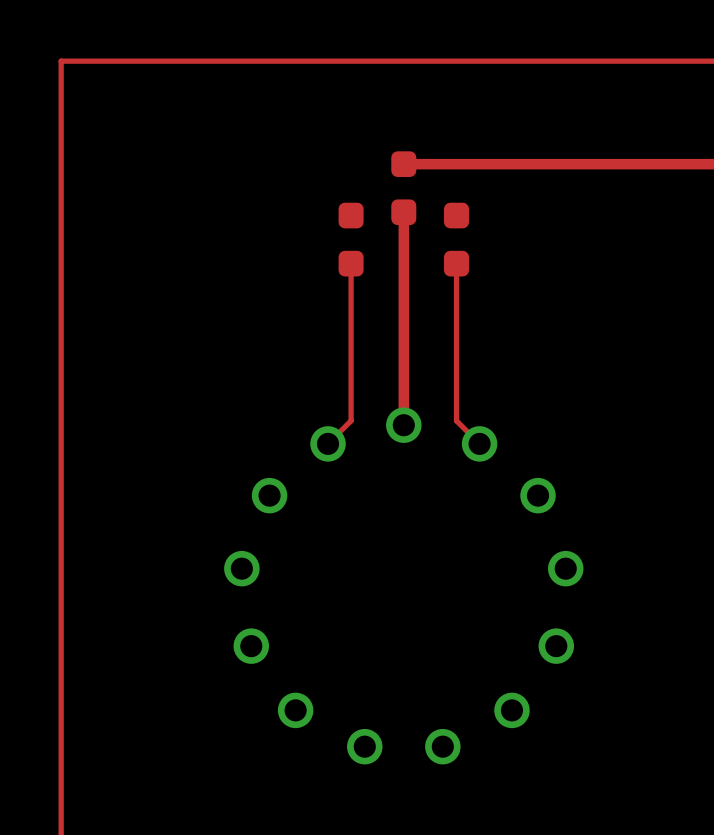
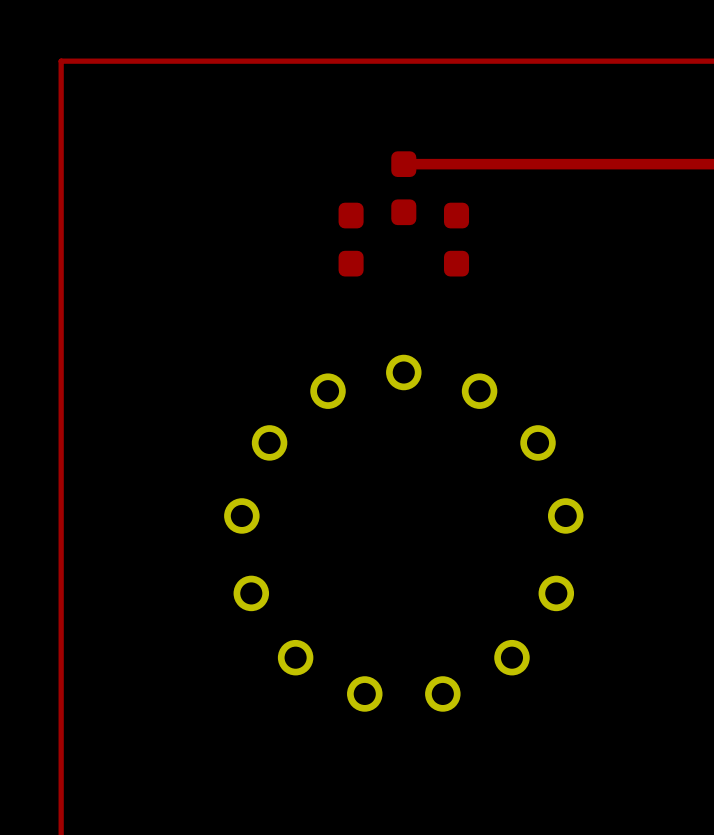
top track: (403, 212) (403, 425) -> none
top track: (351, 263) (351, 420) (328, 443) -> none
top track: (456, 263) (456, 420) (479, 443) -> none
part position: (403, 585) -> (403, 533)

